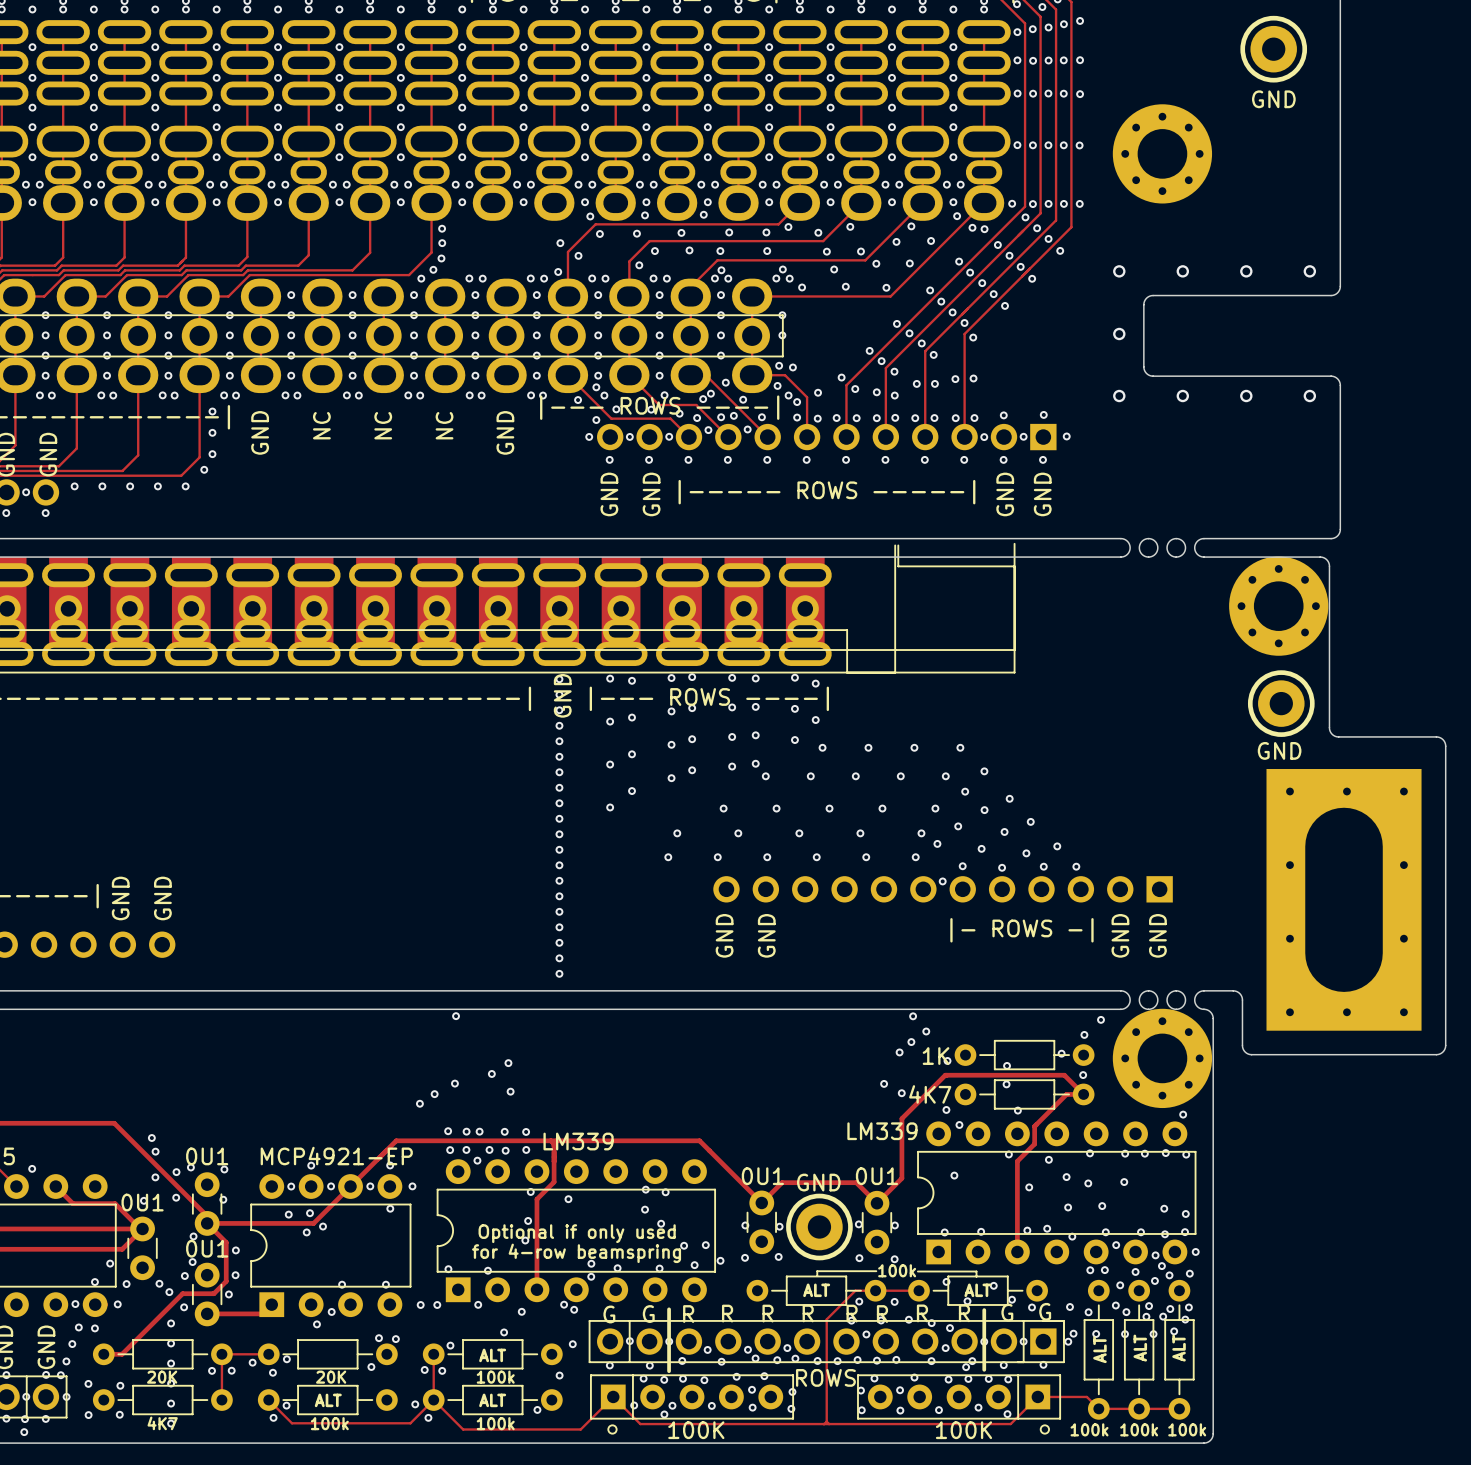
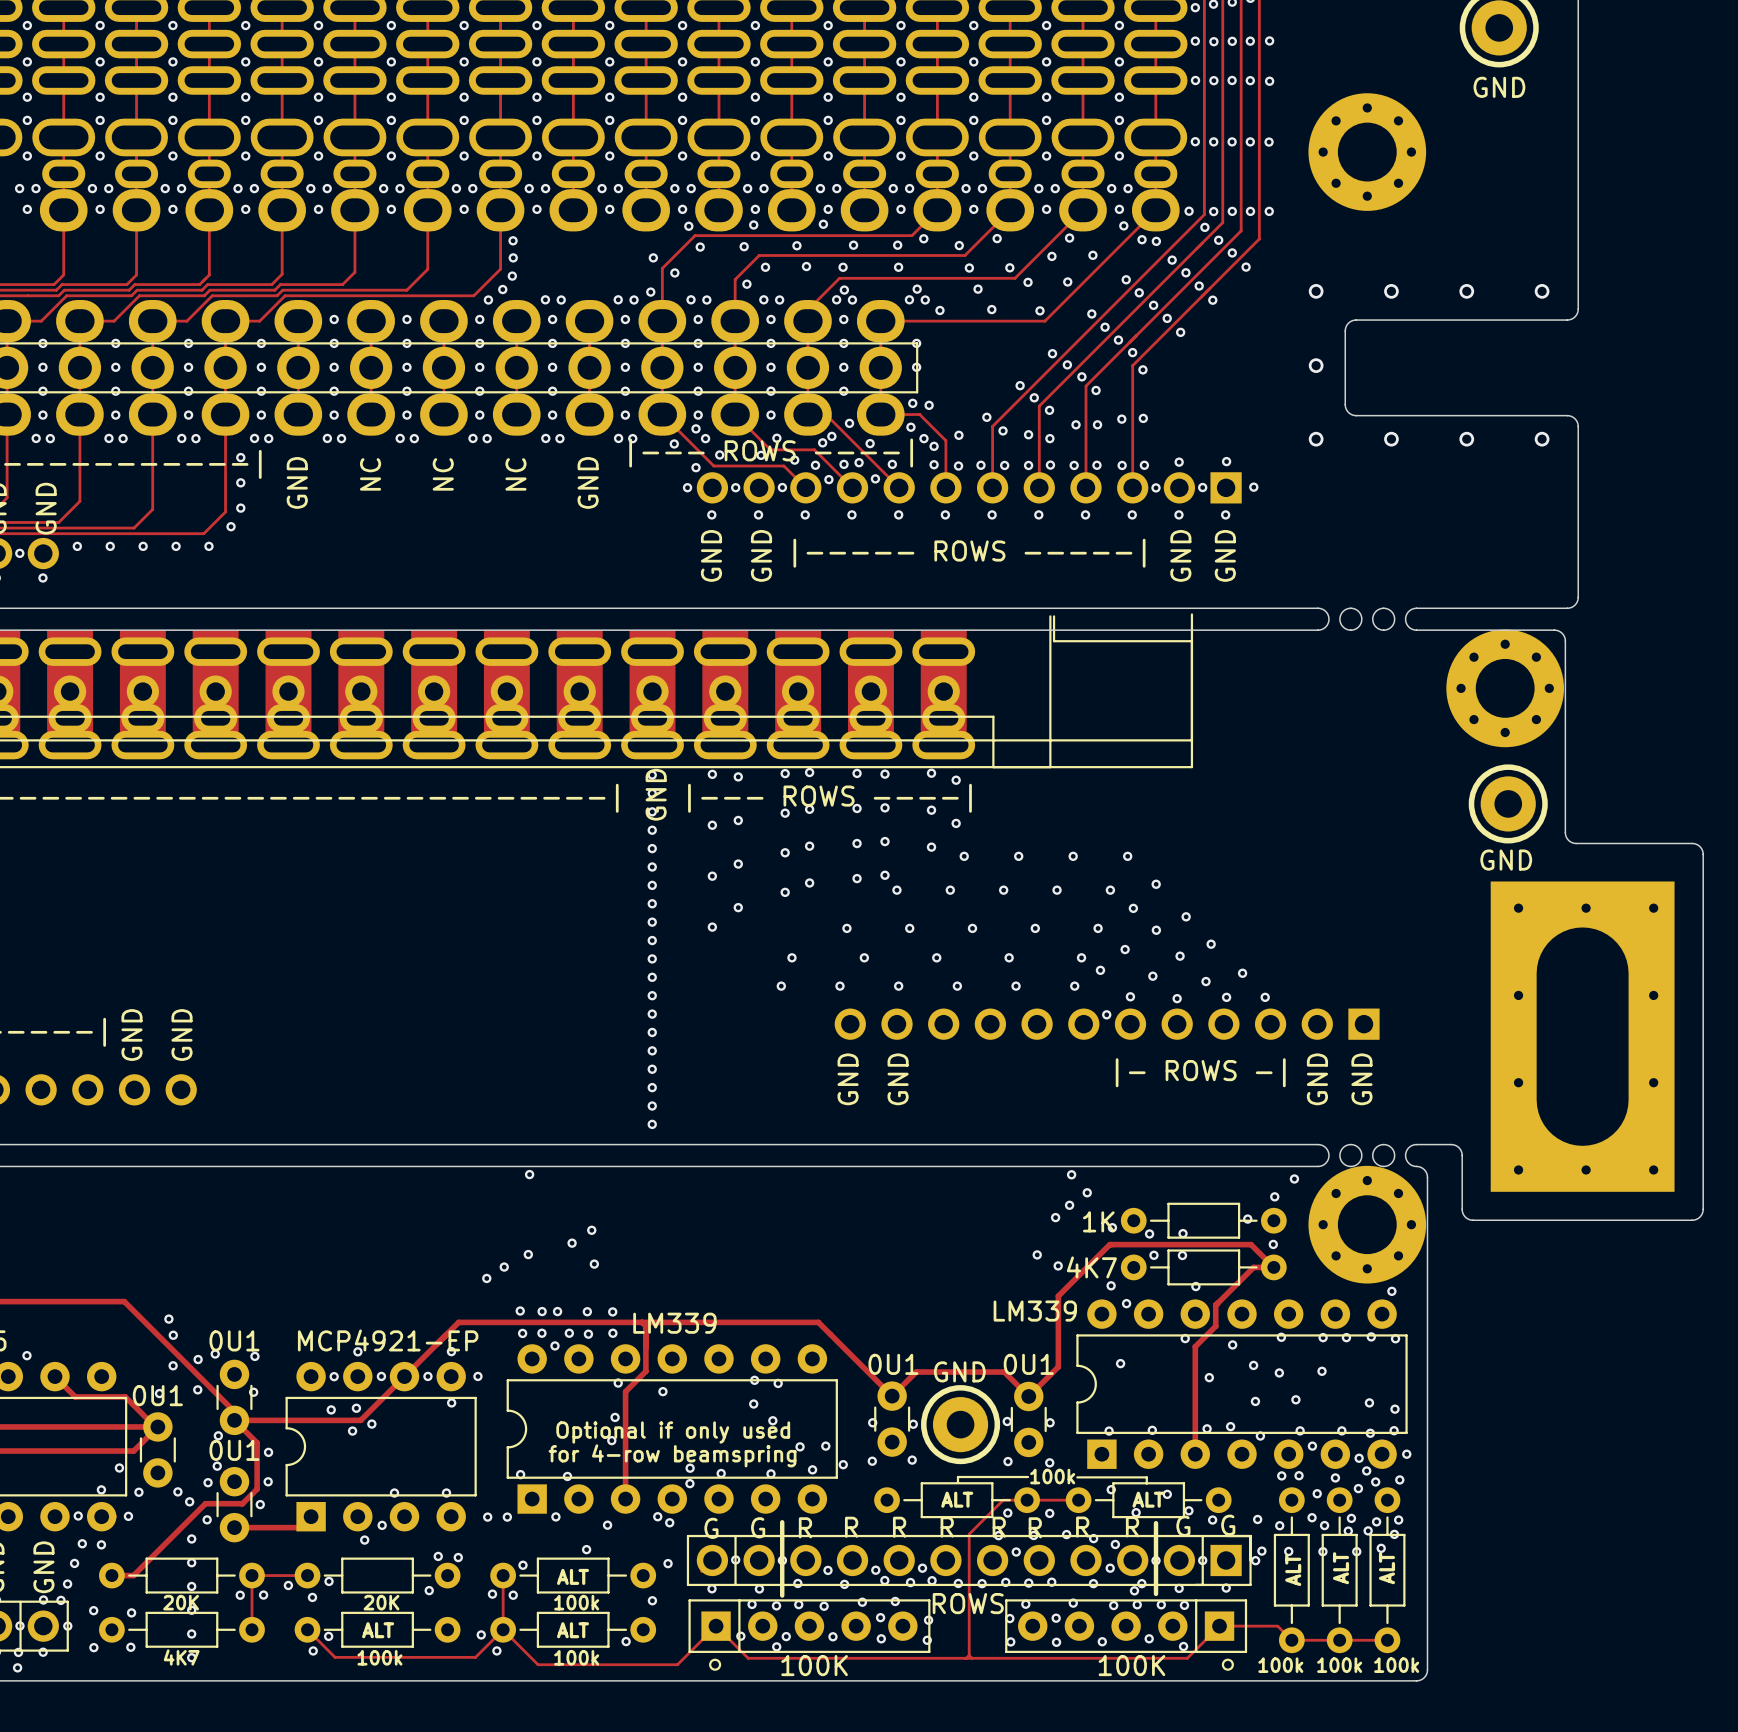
via: none -> (1149, 1233)
via: none -> (1153, 1255)

